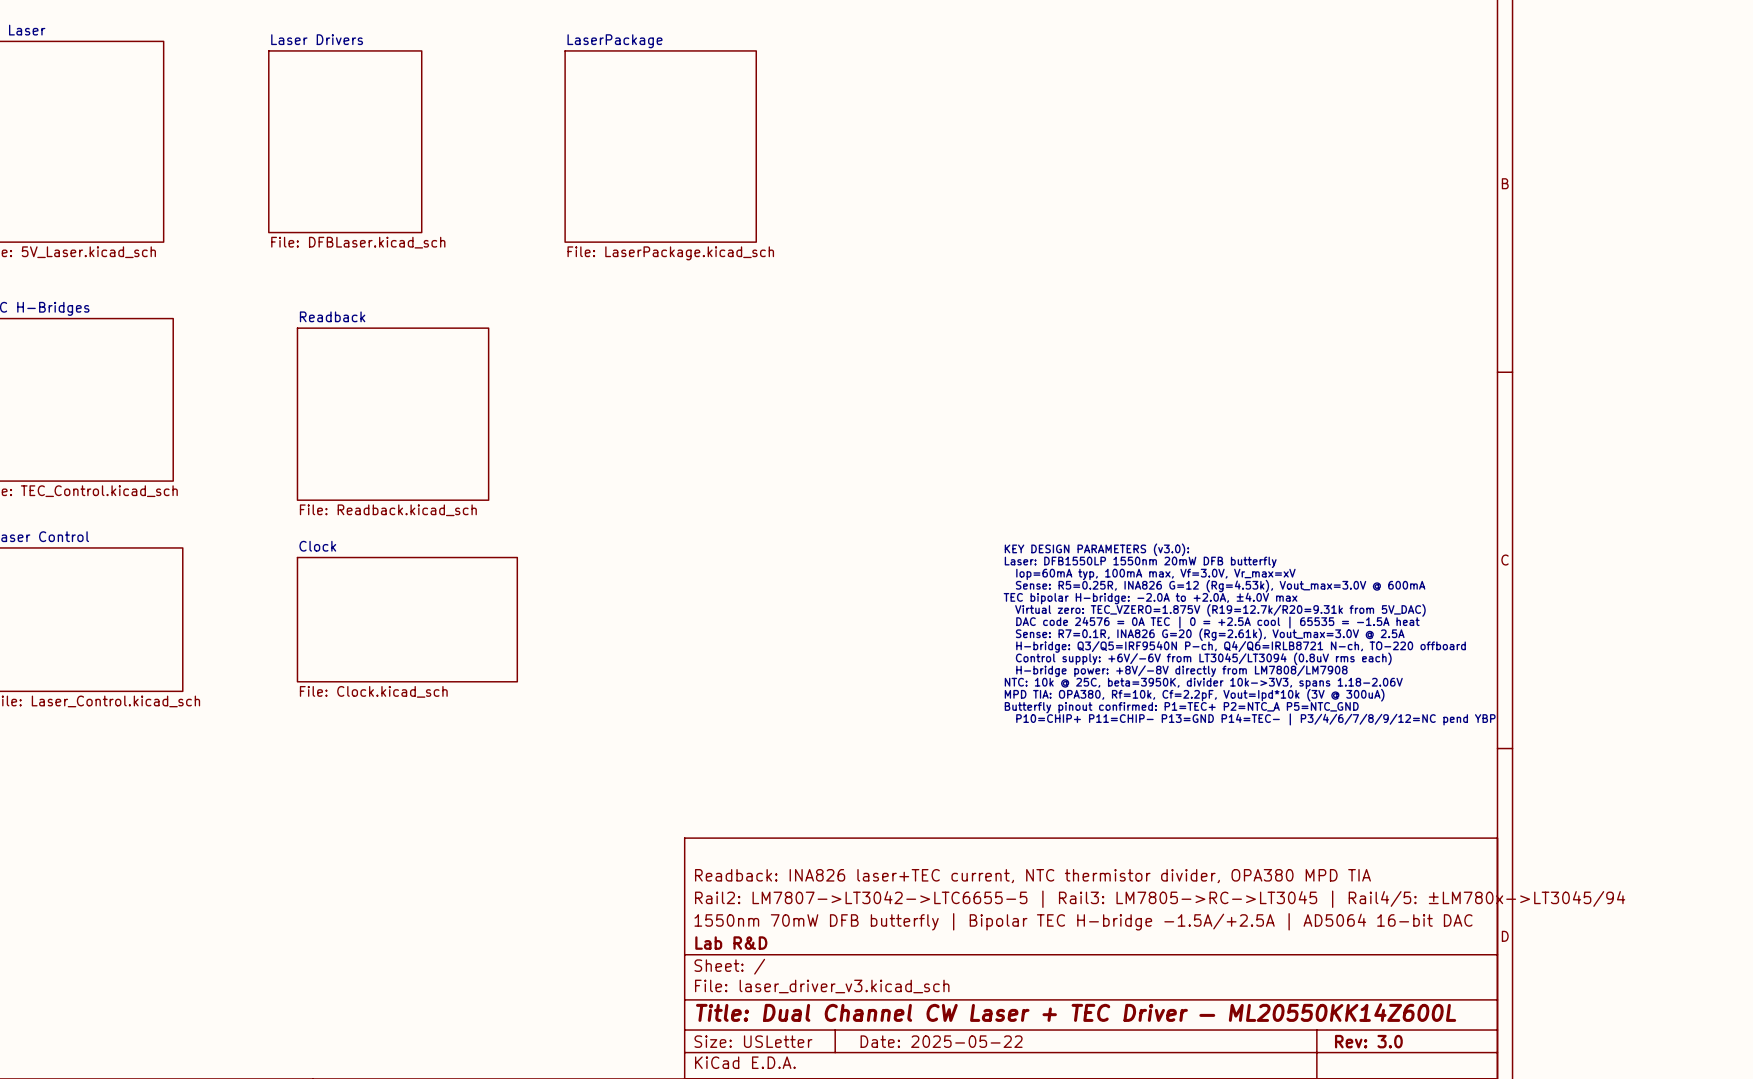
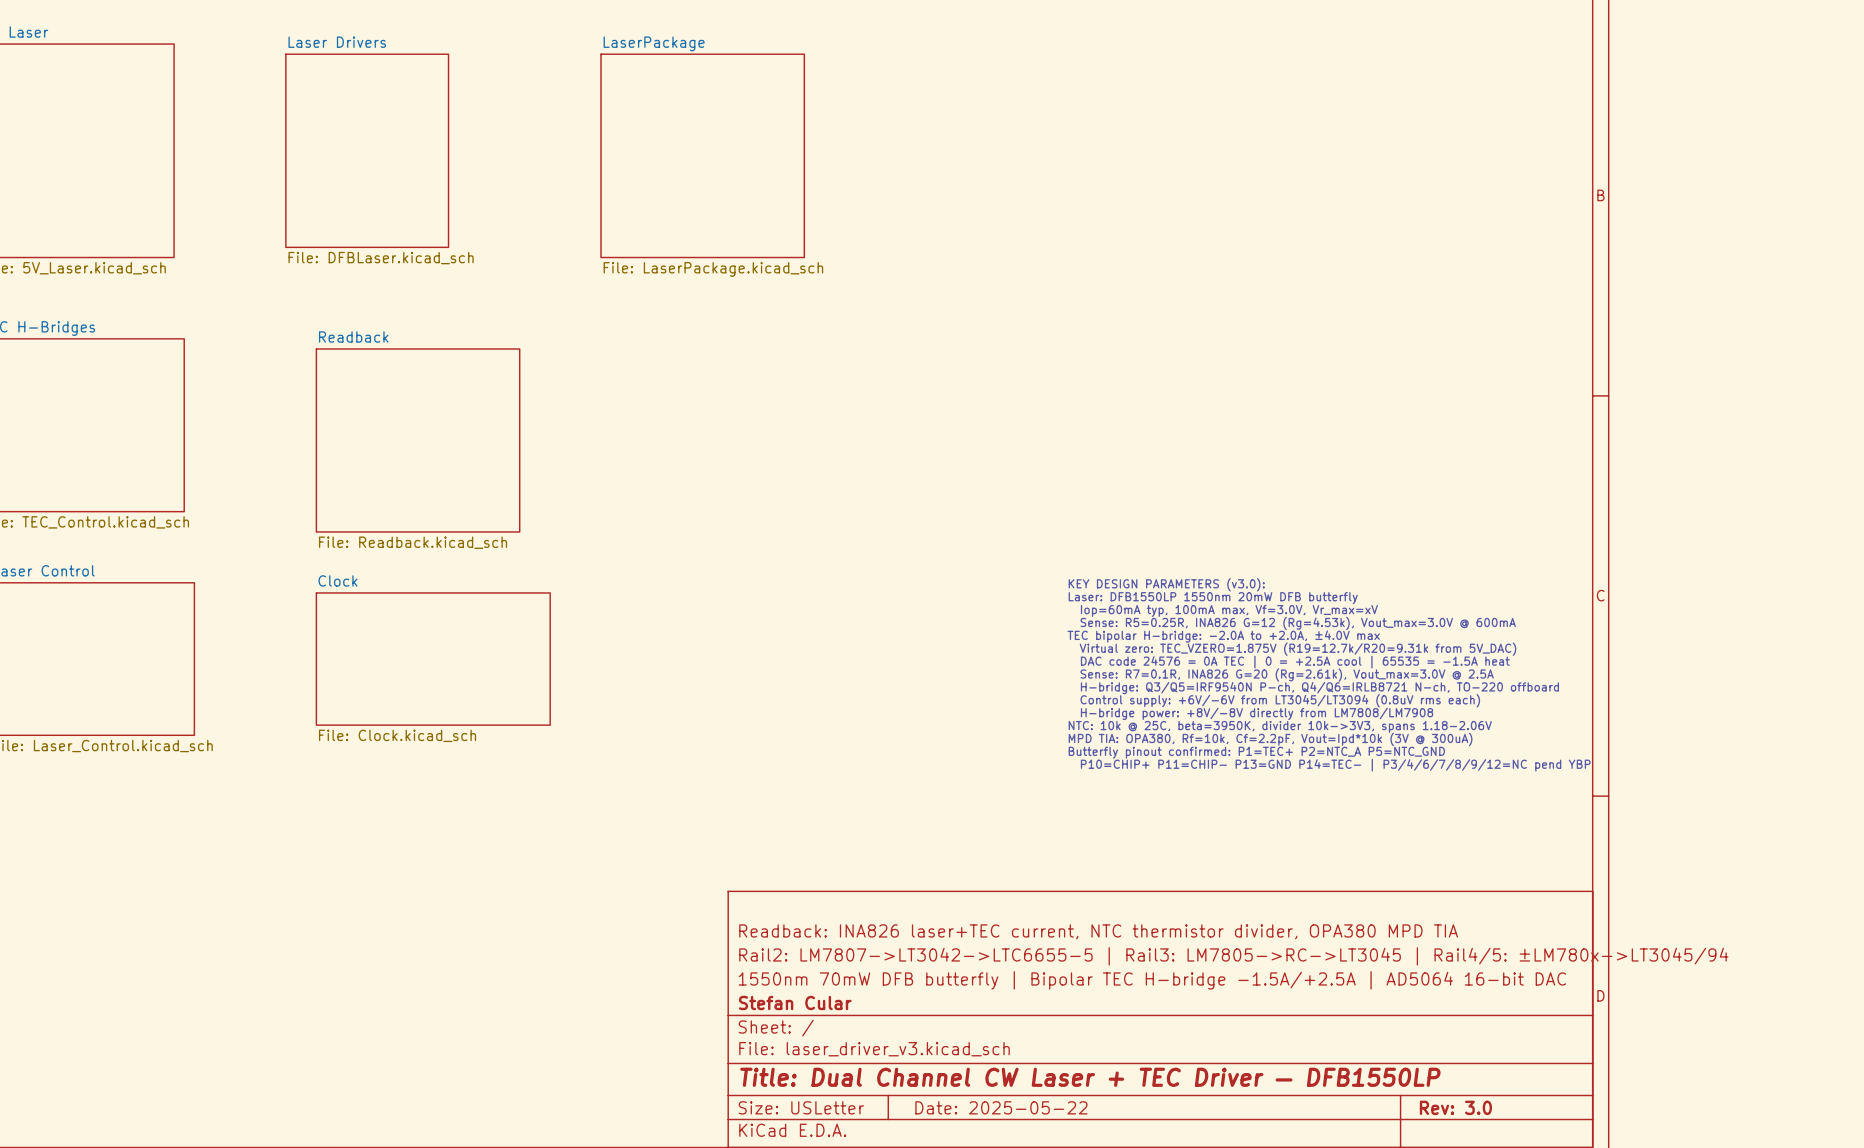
title block: Lab R&D (731, 943) -> Stefan Cular (795, 1002)
title block: Title: Dual Channel CW Laser + TEC Driver — ML20550KK14Z600L (1076, 1012) -> Title: Dual Channel CW Laser + TEC Driver — DFB1550LP (1090, 1077)

